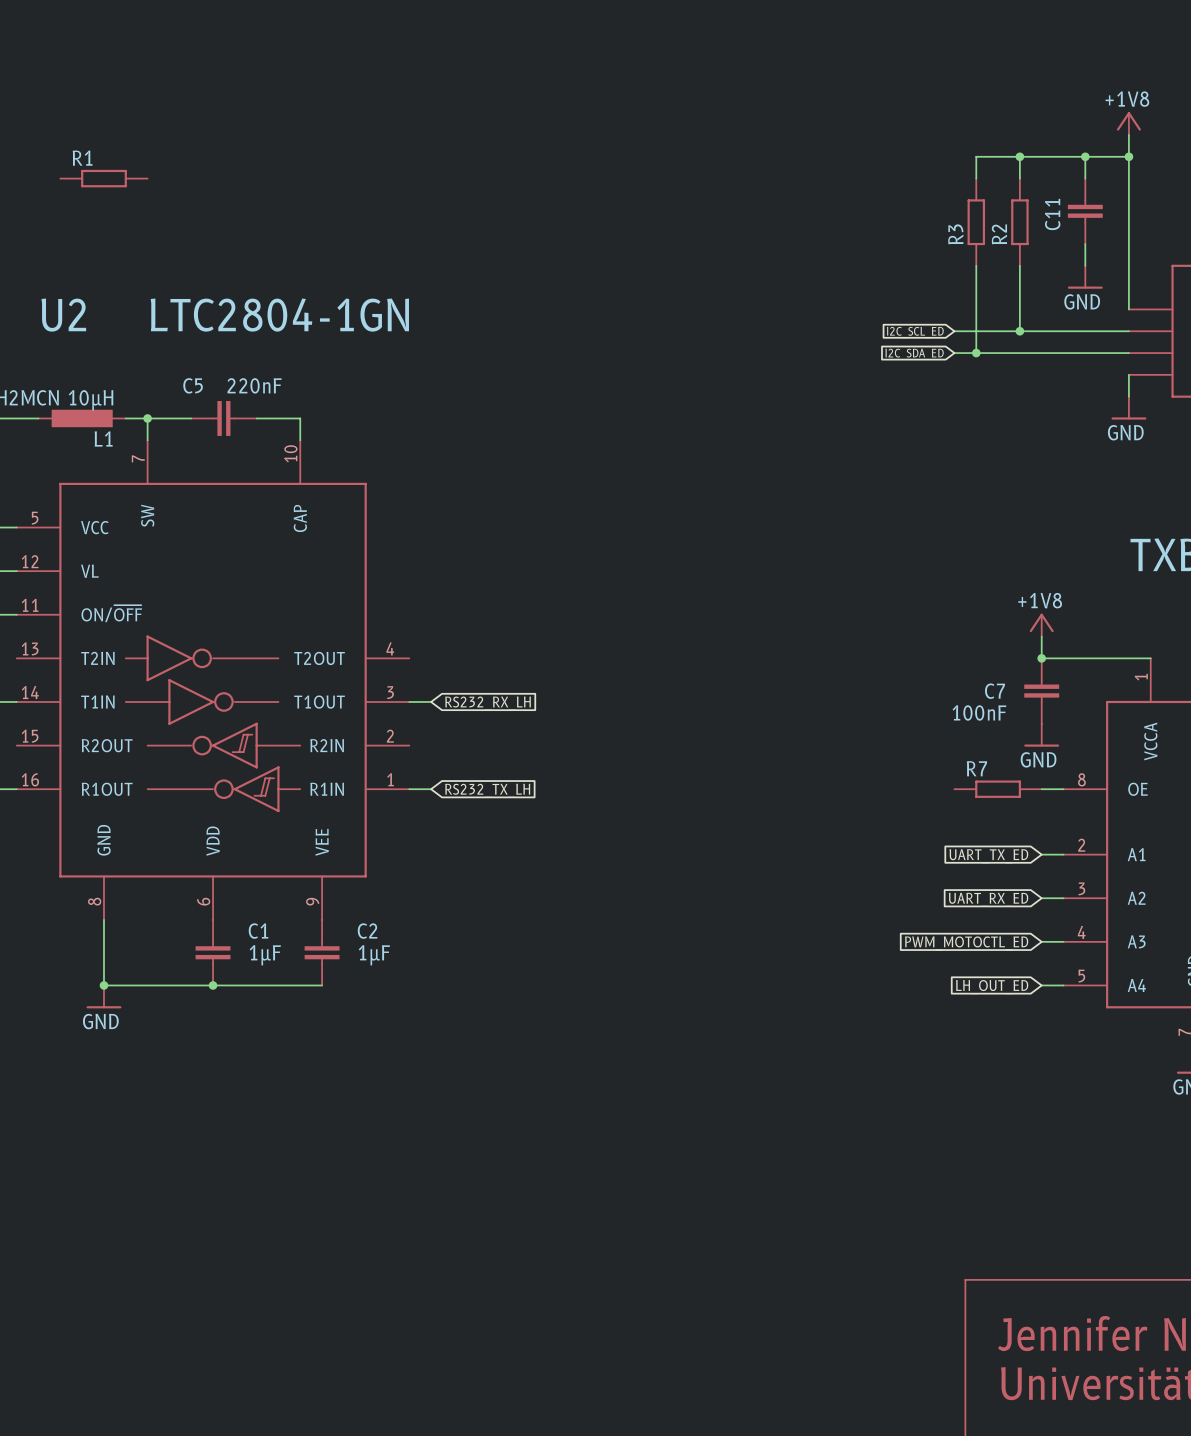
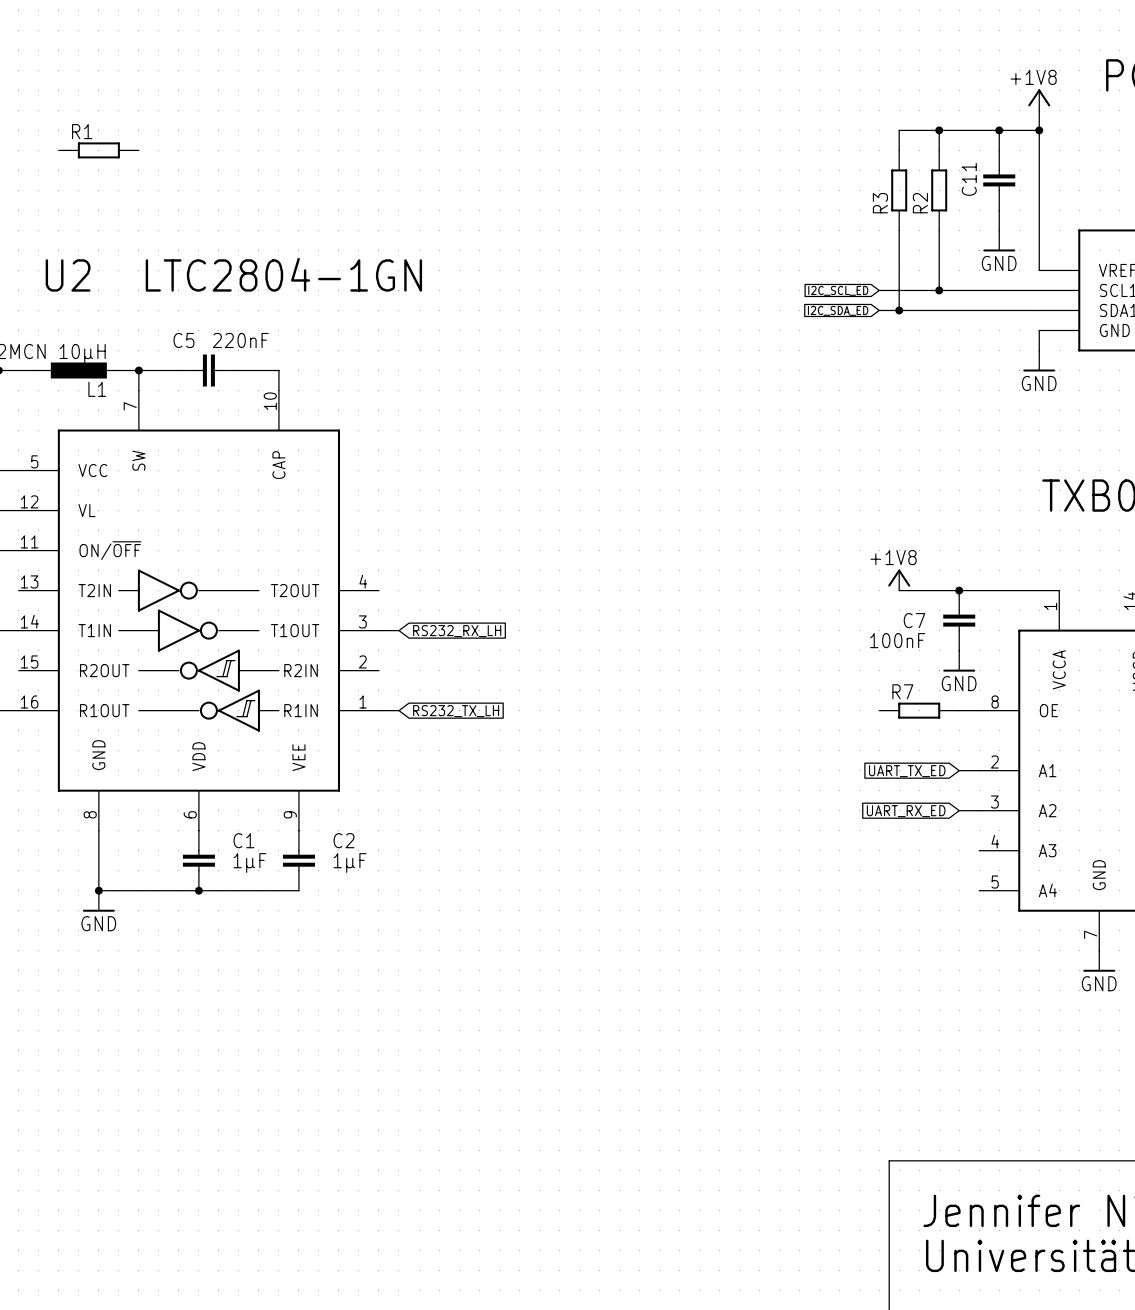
power symbol position: +1V8 (1041, 625) -> +1V8 (899, 580)
wire: (1041, 636) (1041, 658) -> (899, 590) (959, 590)
wire: (1041, 941) (1063, 941) -> none
global label: PWM_MOTOCTL_ED (966, 943) -> none
wire: (1041, 985) (1063, 985) -> none
global label: LH_OUT_ED (992, 987) -> none

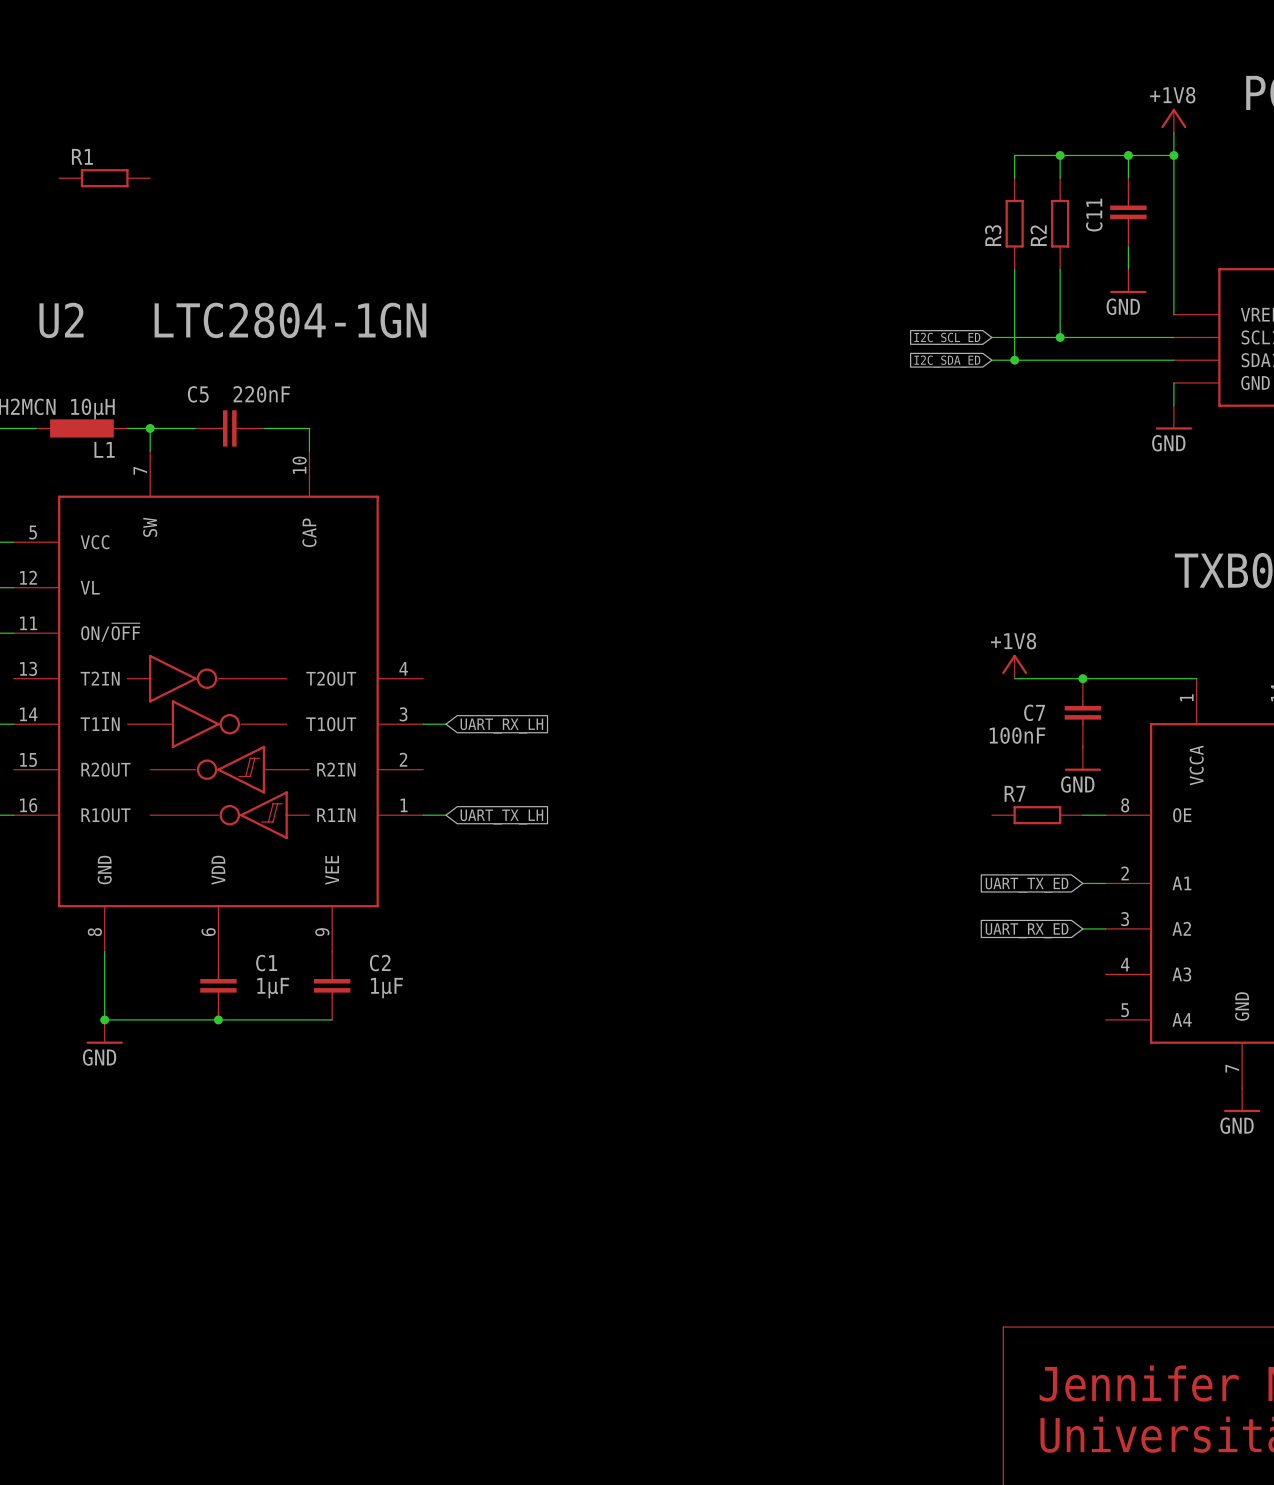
global label: RS232_RX_LH (457, 631) -> UART_RX_LH (501, 726)
global label: RS232_TX_LH (456, 711) -> UART_TX_LH (501, 817)

